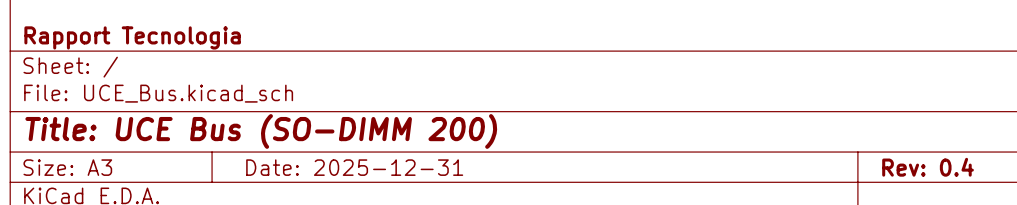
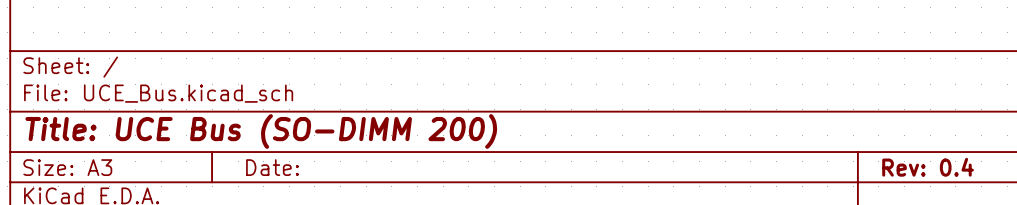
title block: Rapport Tecnologia (132, 37) -> none
title block: Date: 2025-12-31 (354, 167) -> Date: (272, 167)

